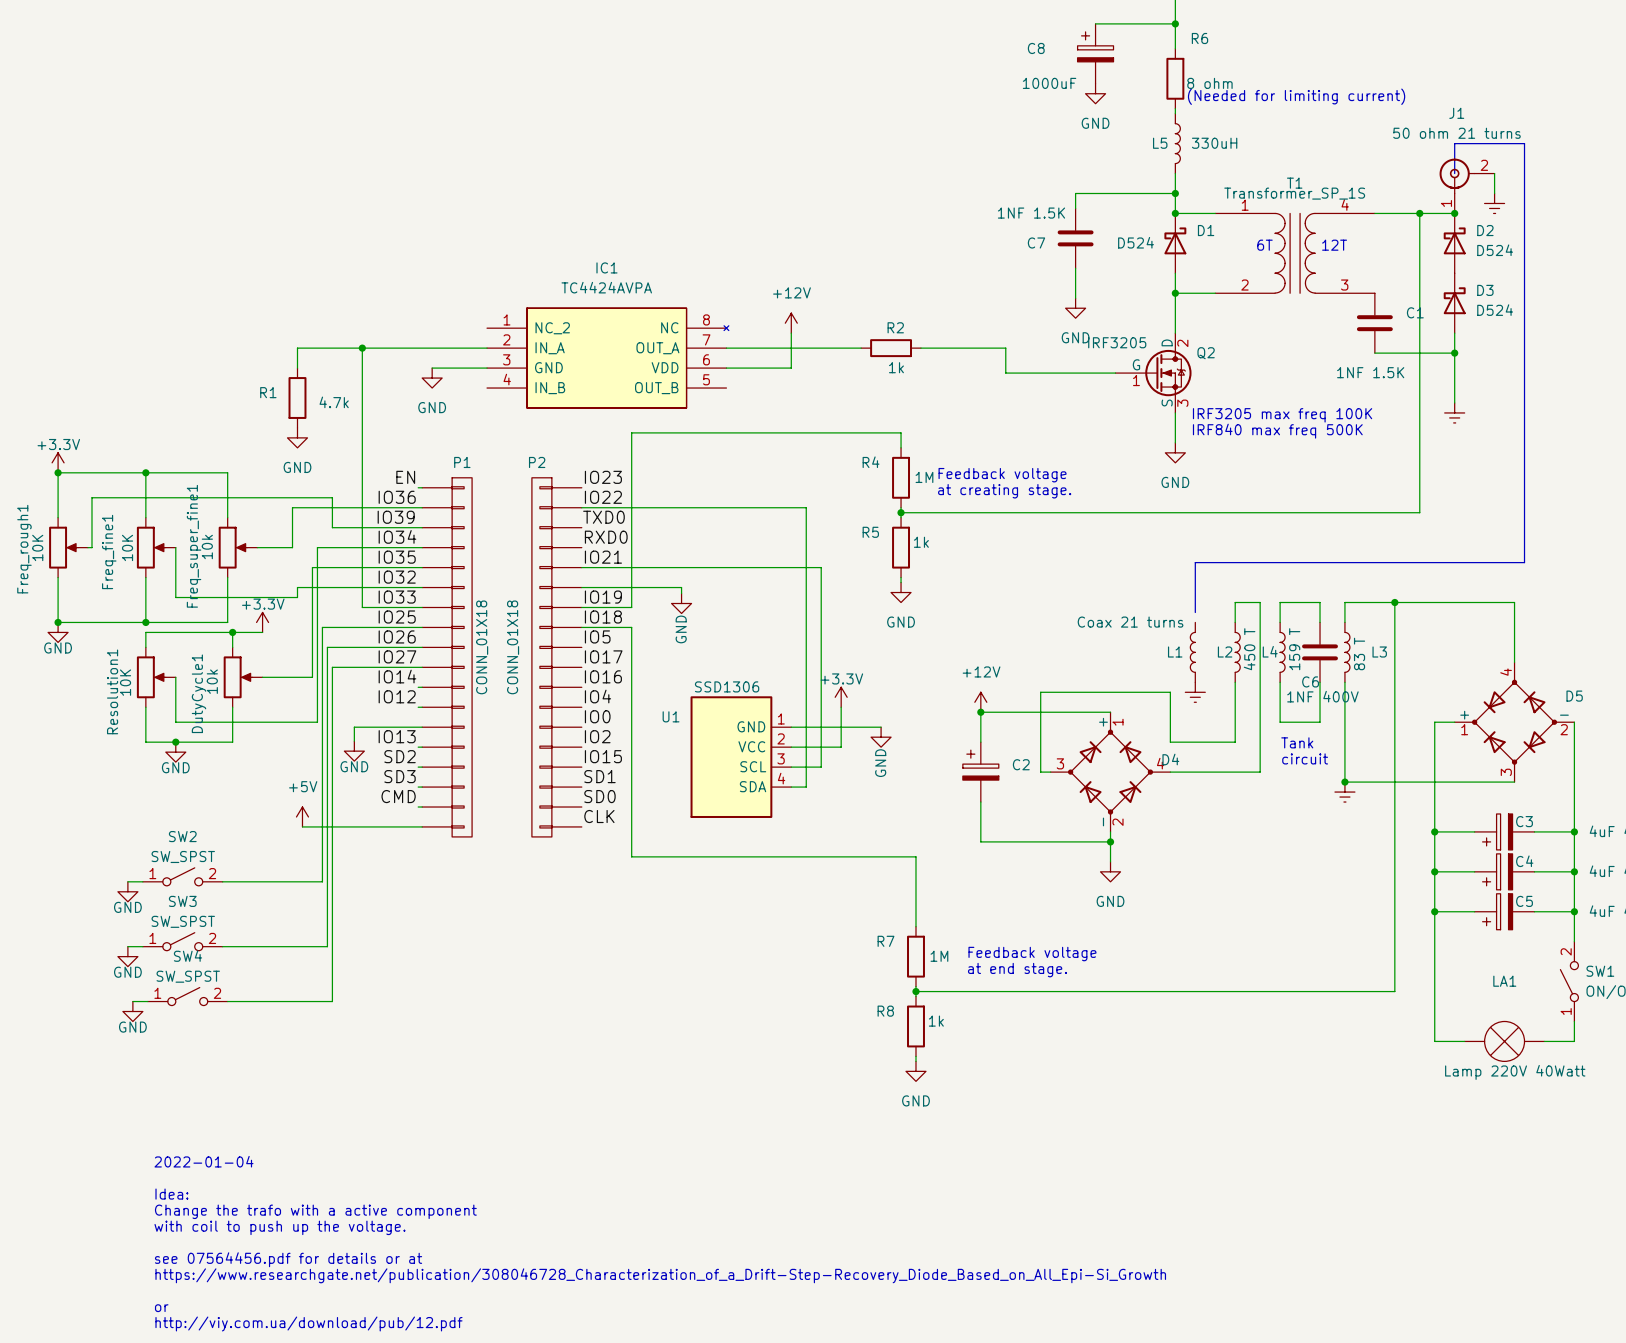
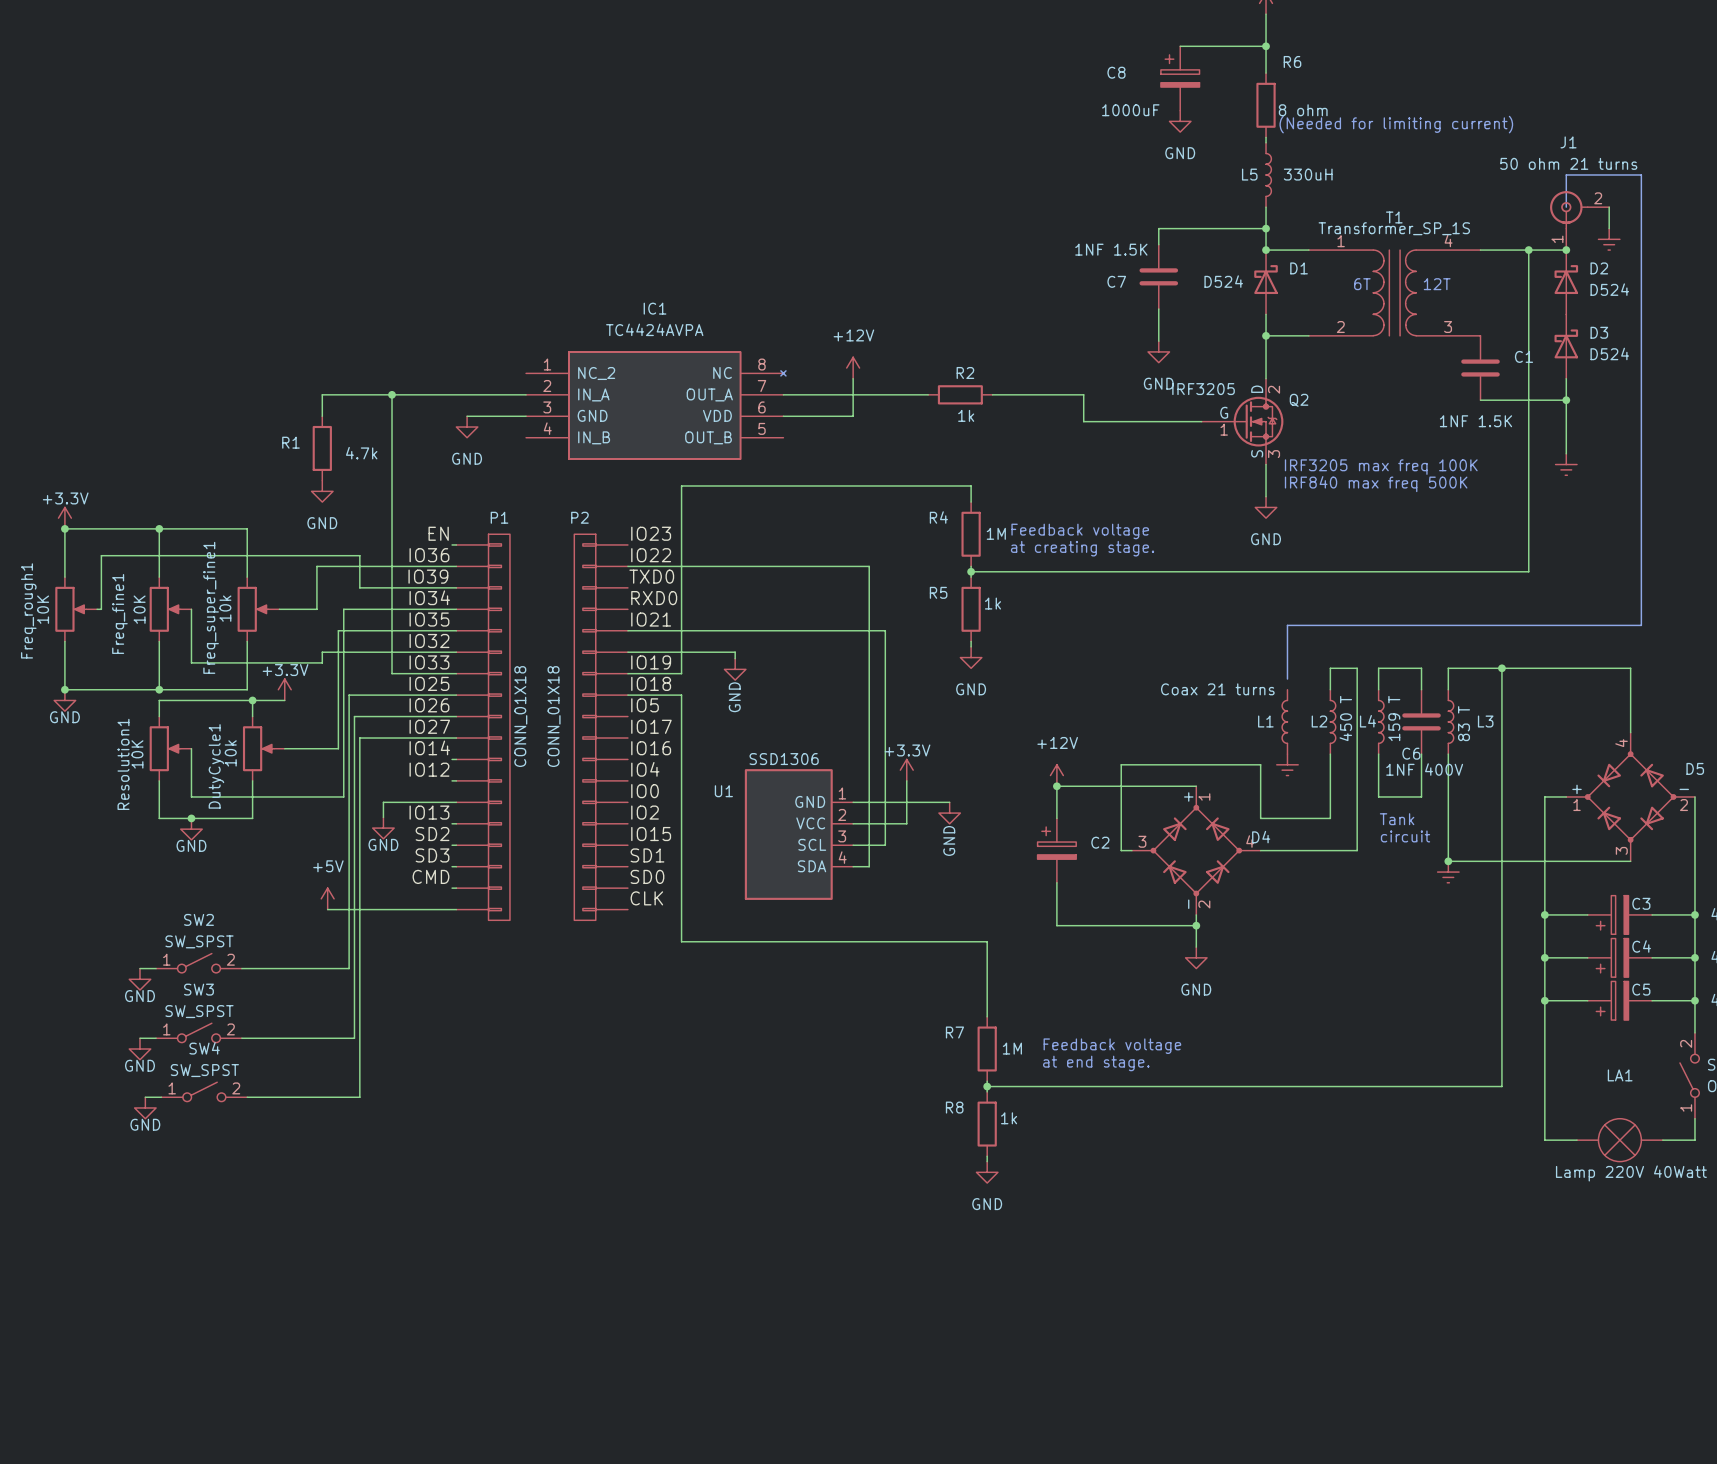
text: 2022-01-04 (203, 1161) -> none
text: Idea: (171, 1194) -> none
text: Change the trafo with a active component (315, 1211) -> none
text: with coil to push up the voltage. (279, 1227) -> none
text: see 07564456.pdf for details or at (288, 1259) -> none
text: https://www.researchgate.net/publication/308046728_Characterization_of_a_Drift-Step-Recovery_Diode_Based_on_All_Epi-Si_Growth (660, 1275) -> none
text: or (161, 1308) -> none
text: http://viy.com.ua/download/pub/12.pdf (308, 1323) -> none

